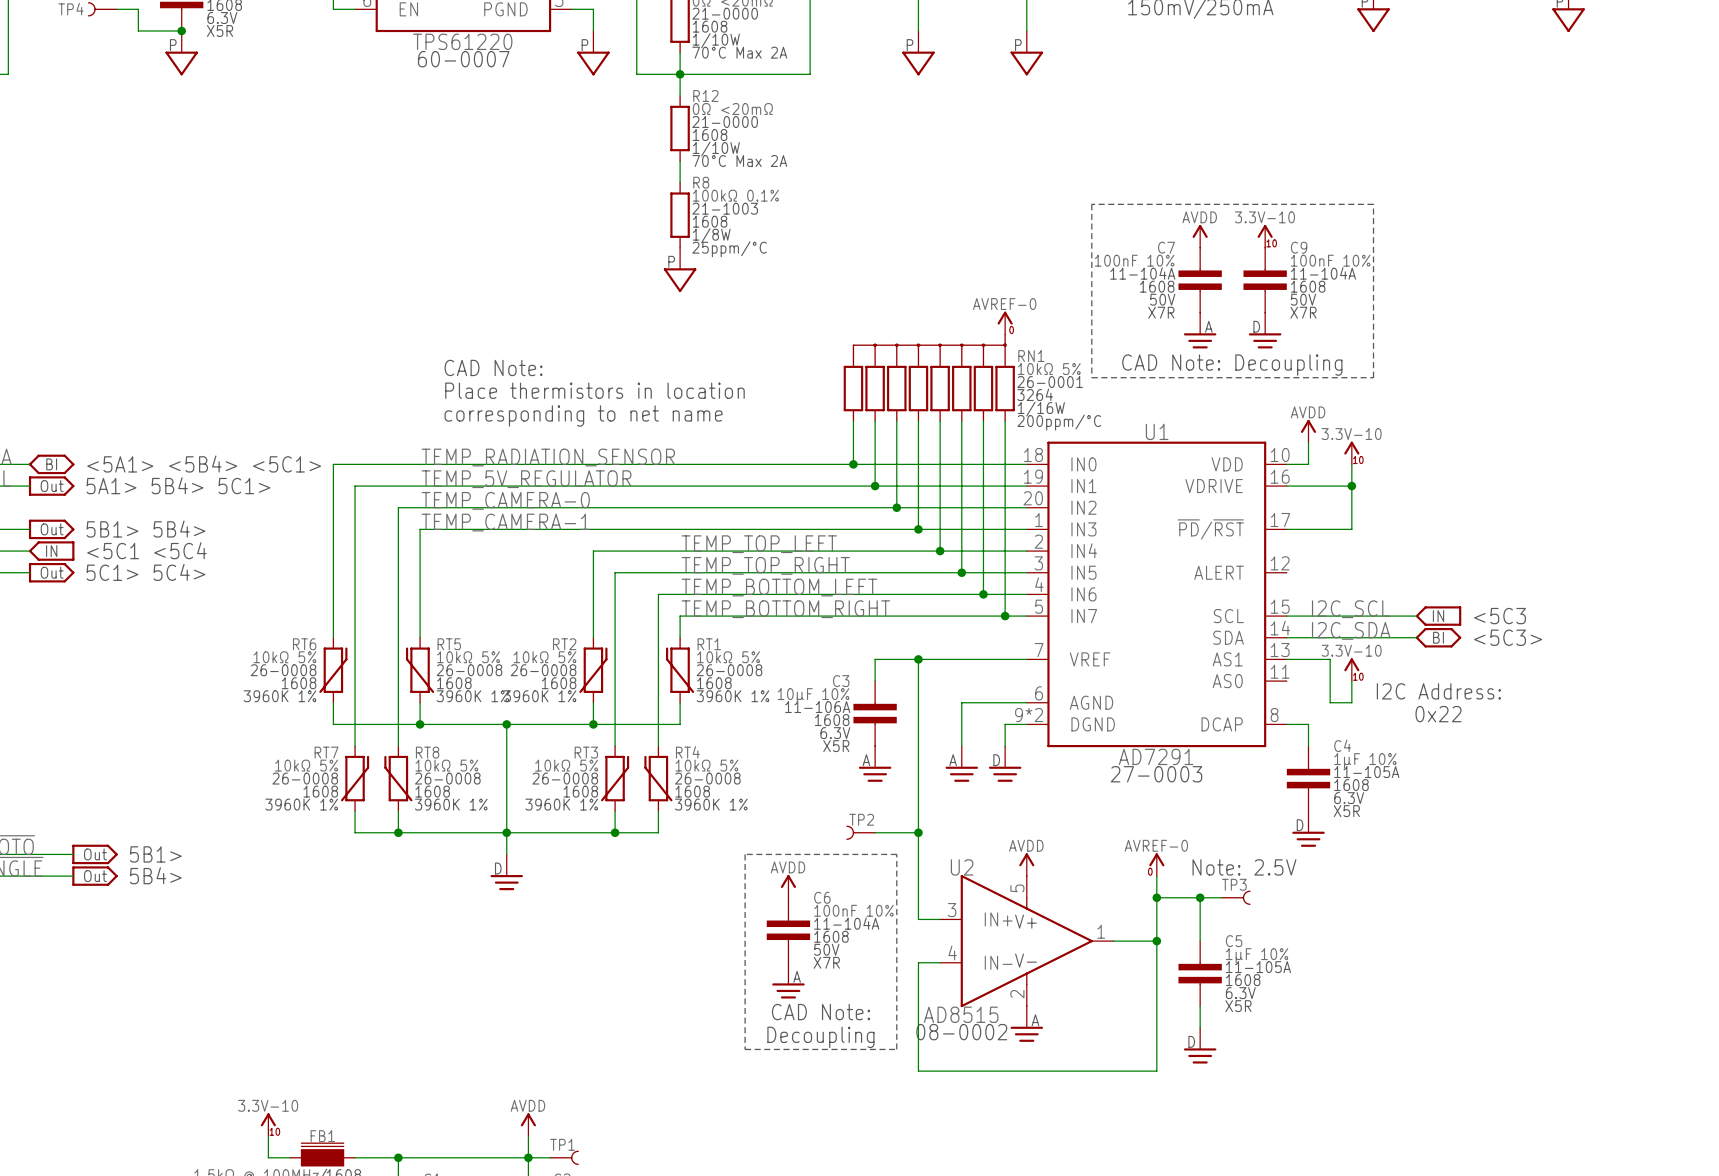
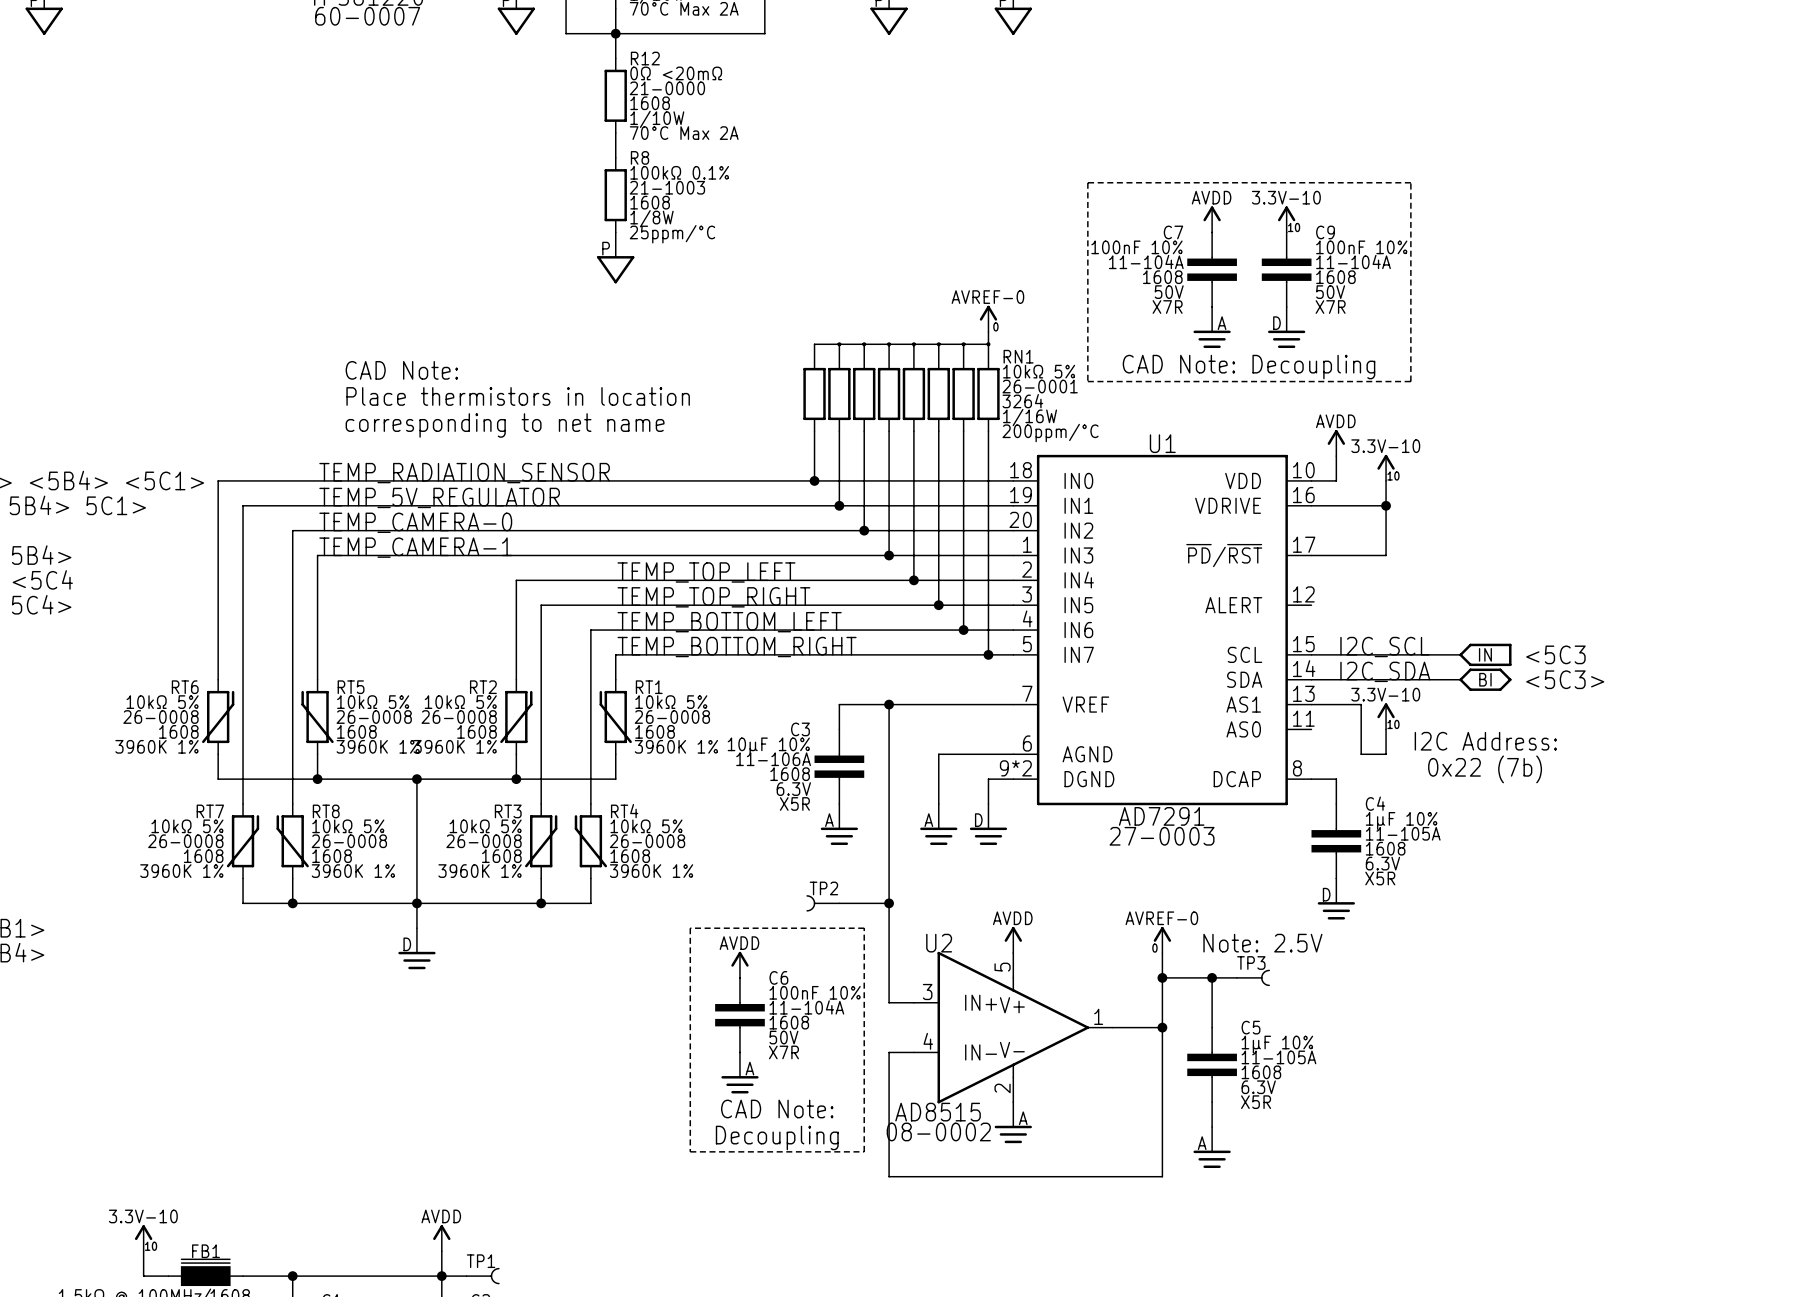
text: 0x22 (1438, 714) -> 0x22 (7b) (1485, 769)
power symbol text: D (1191, 1041) -> A (1202, 1143)

